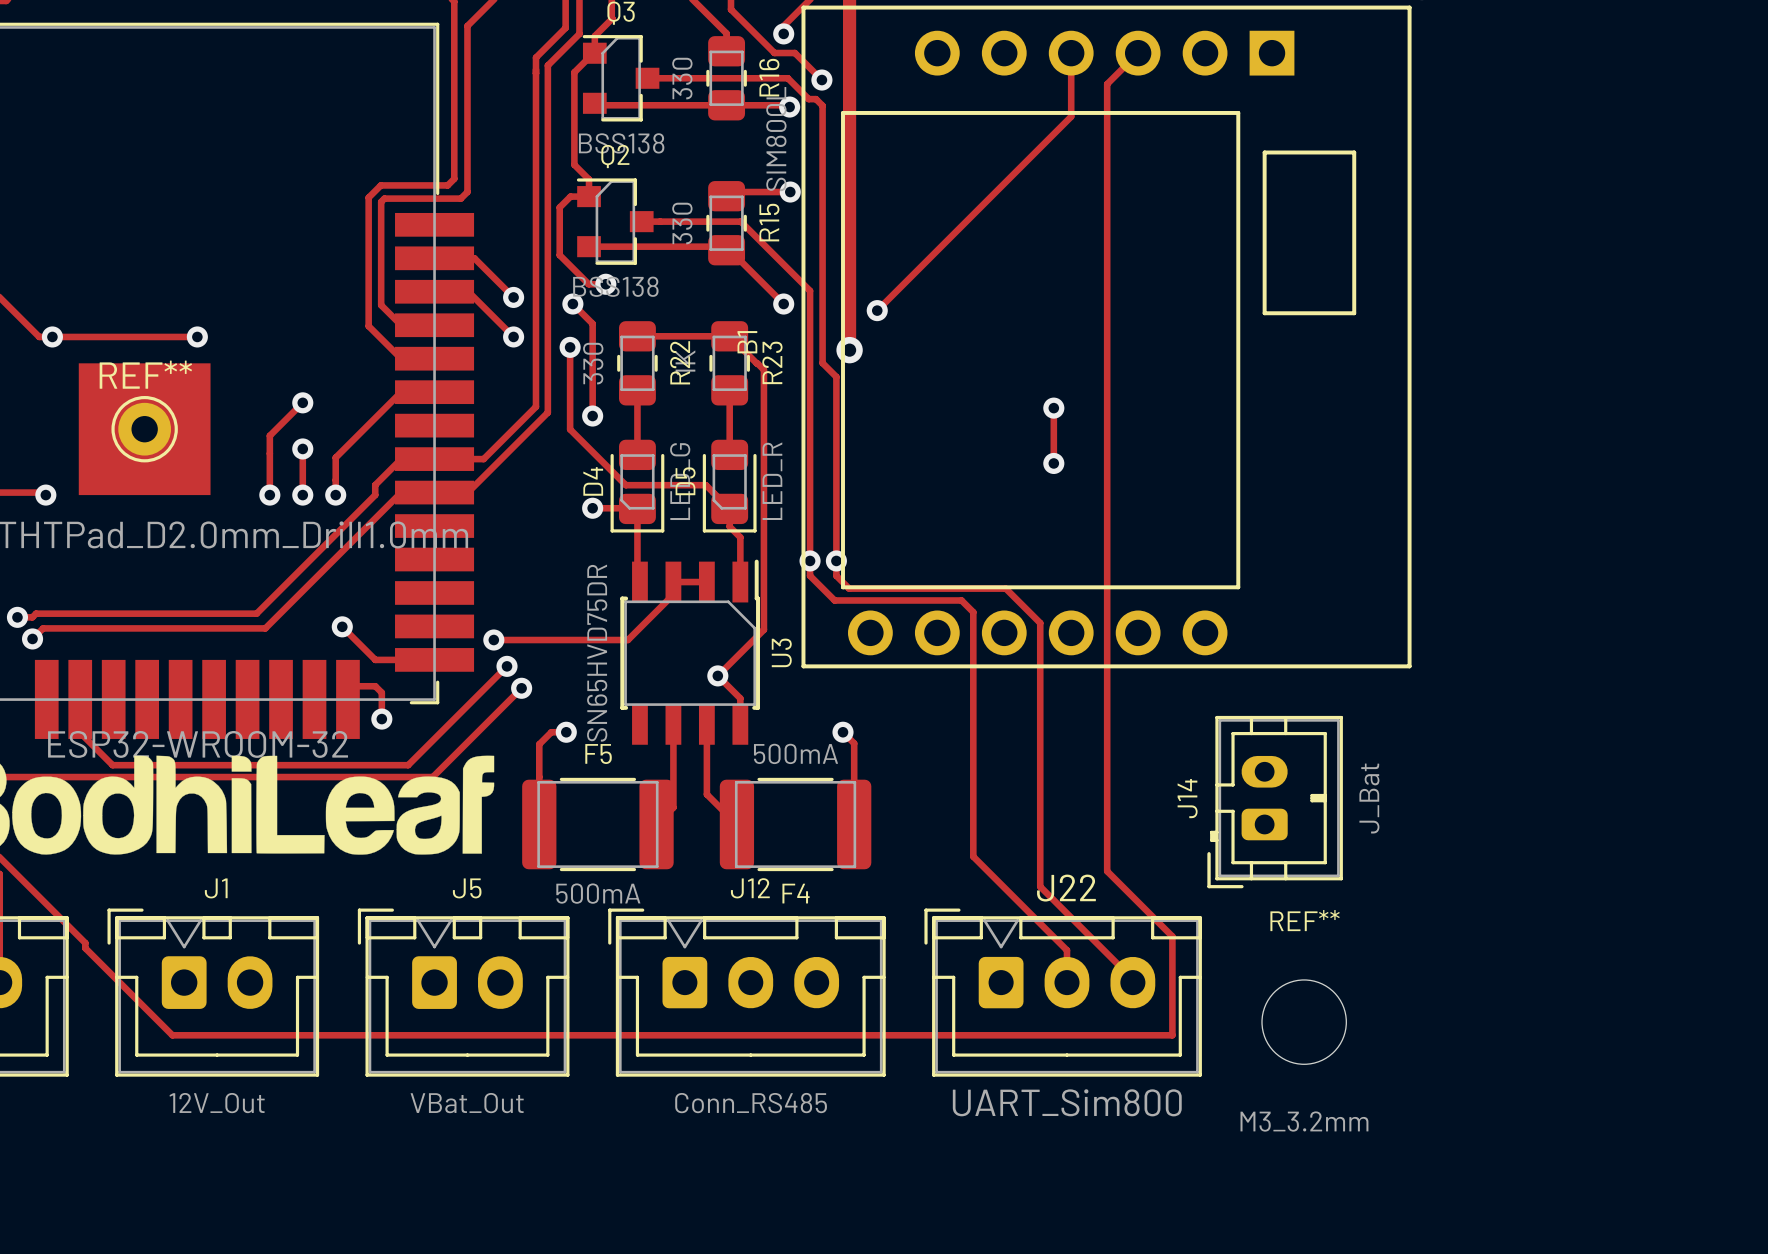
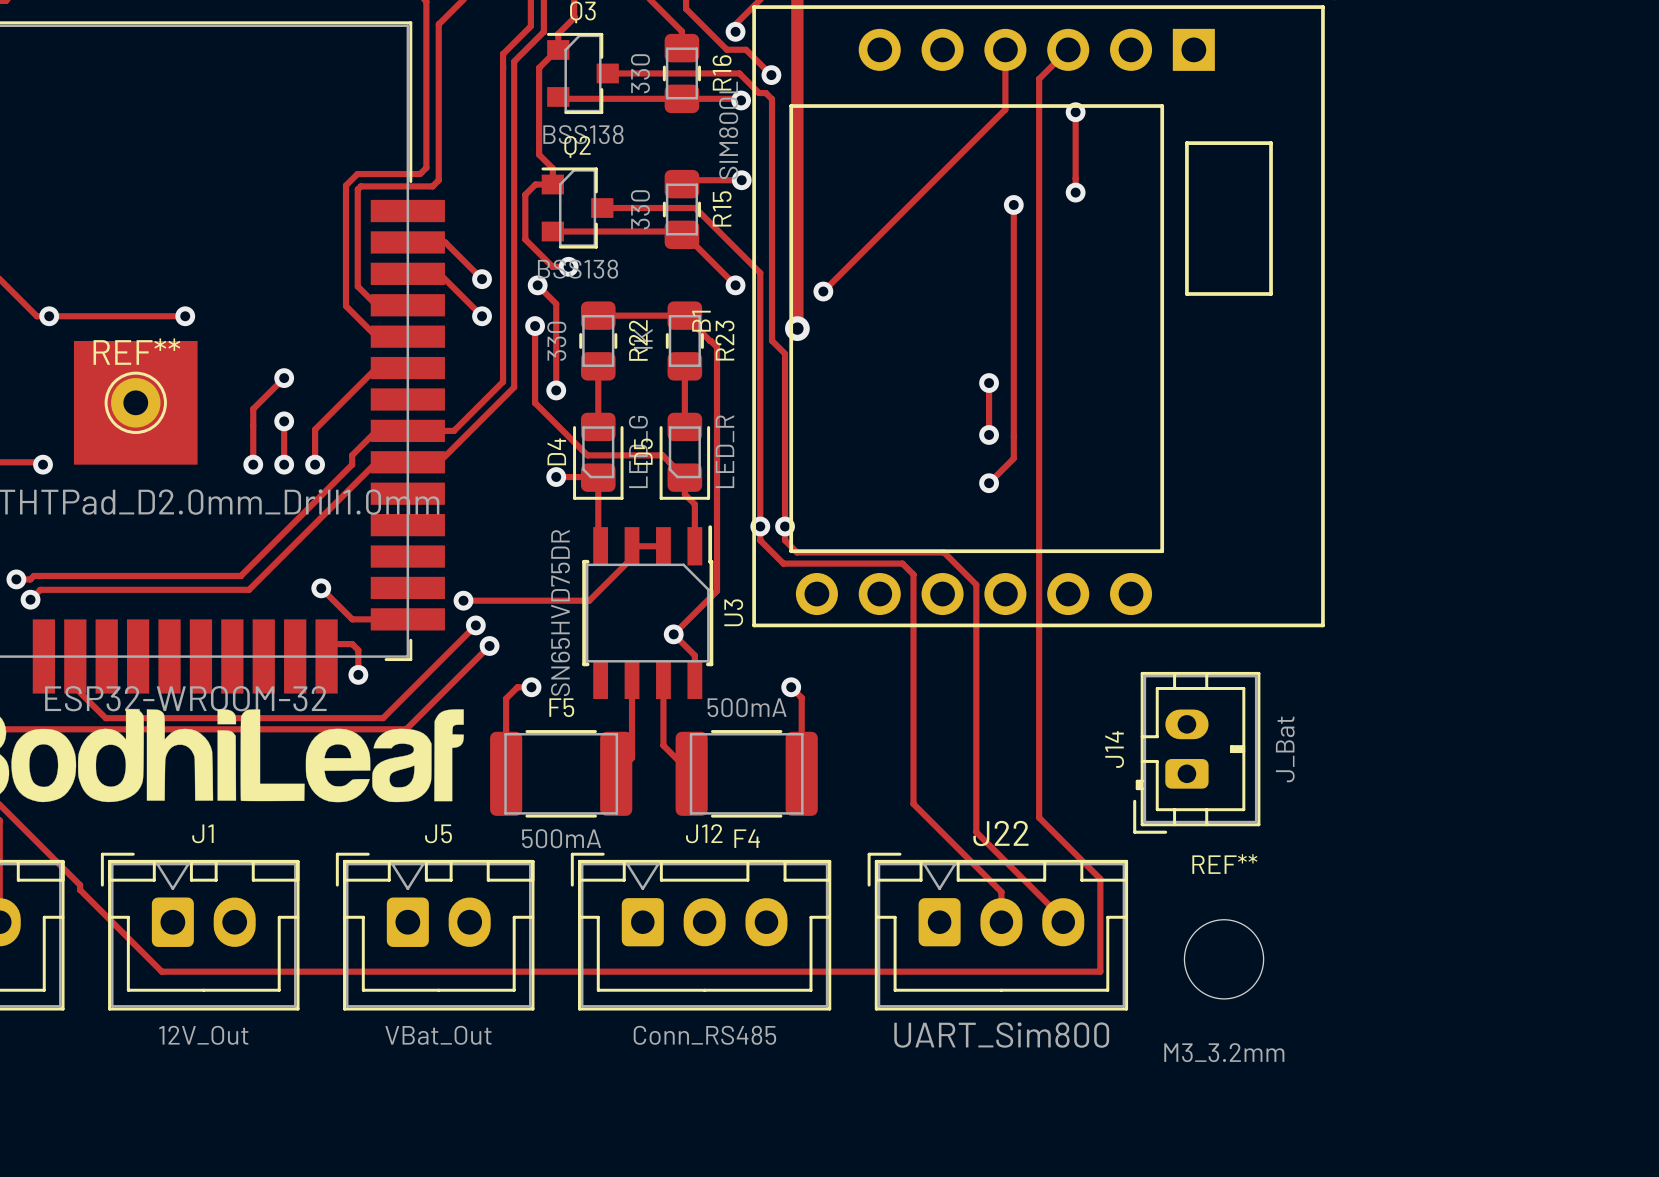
track: none -> (1075, 112) (1075, 192)
via: none -> (1075, 112)
via: none -> (1075, 192)
track: none -> (1013, 204) (1013, 458) (989, 483)
via: none -> (1013, 204)
via: none -> (989, 483)

